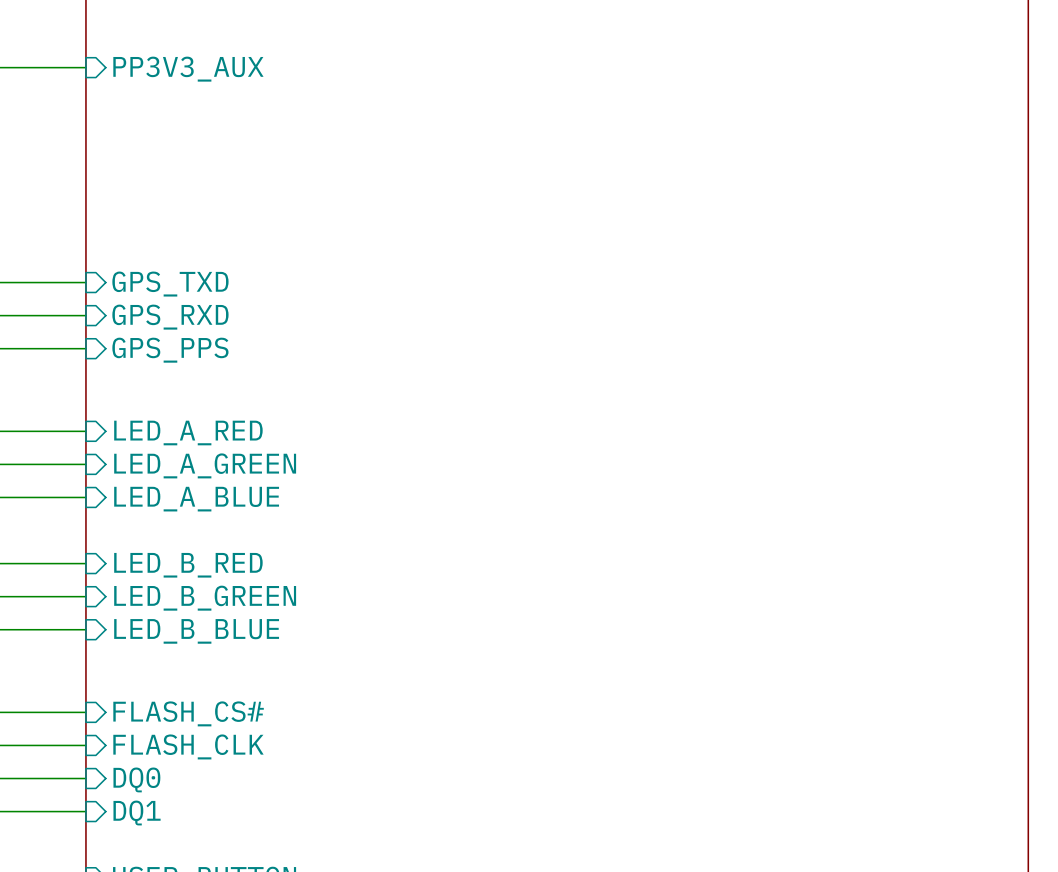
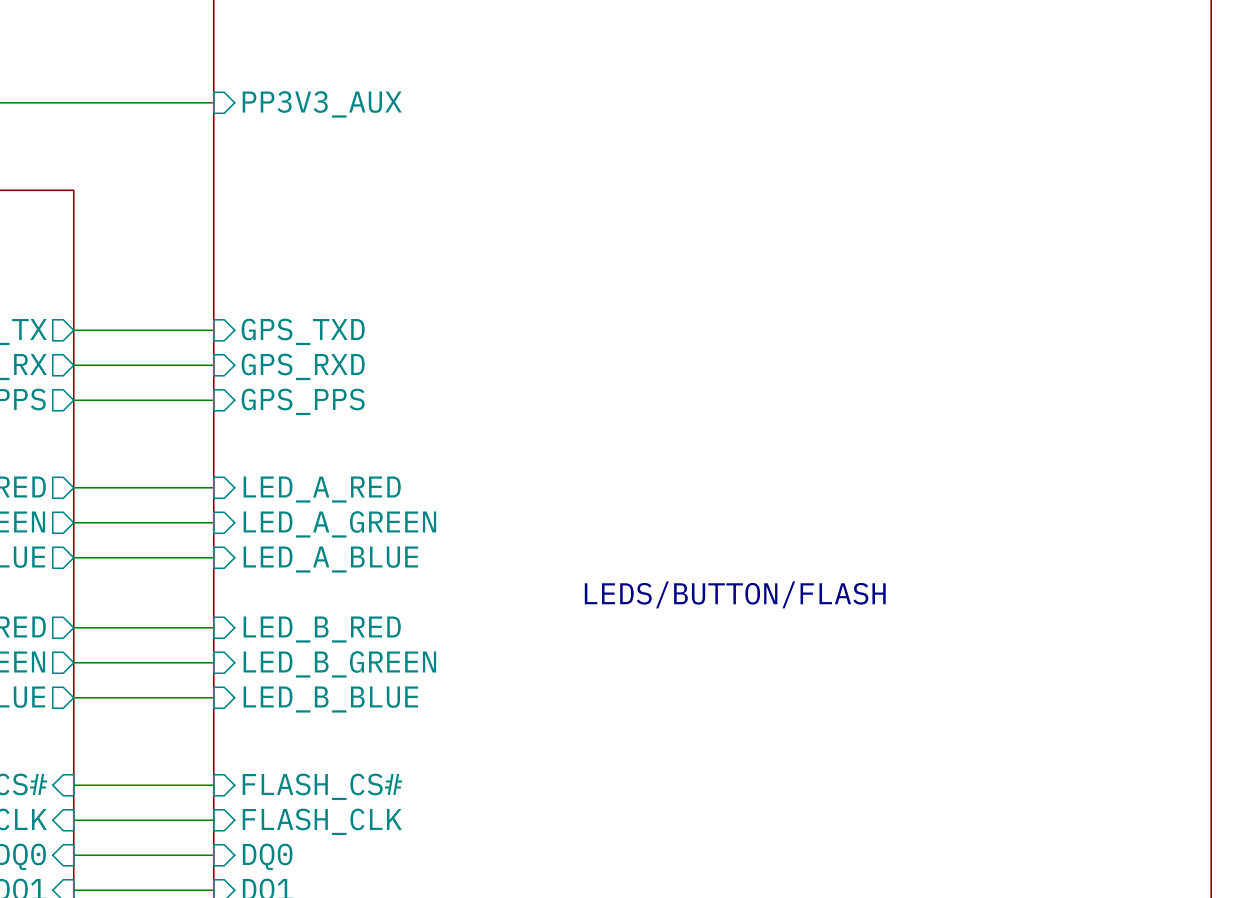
text: none -> LEDS/BUTTON/FLASH (735, 594)

